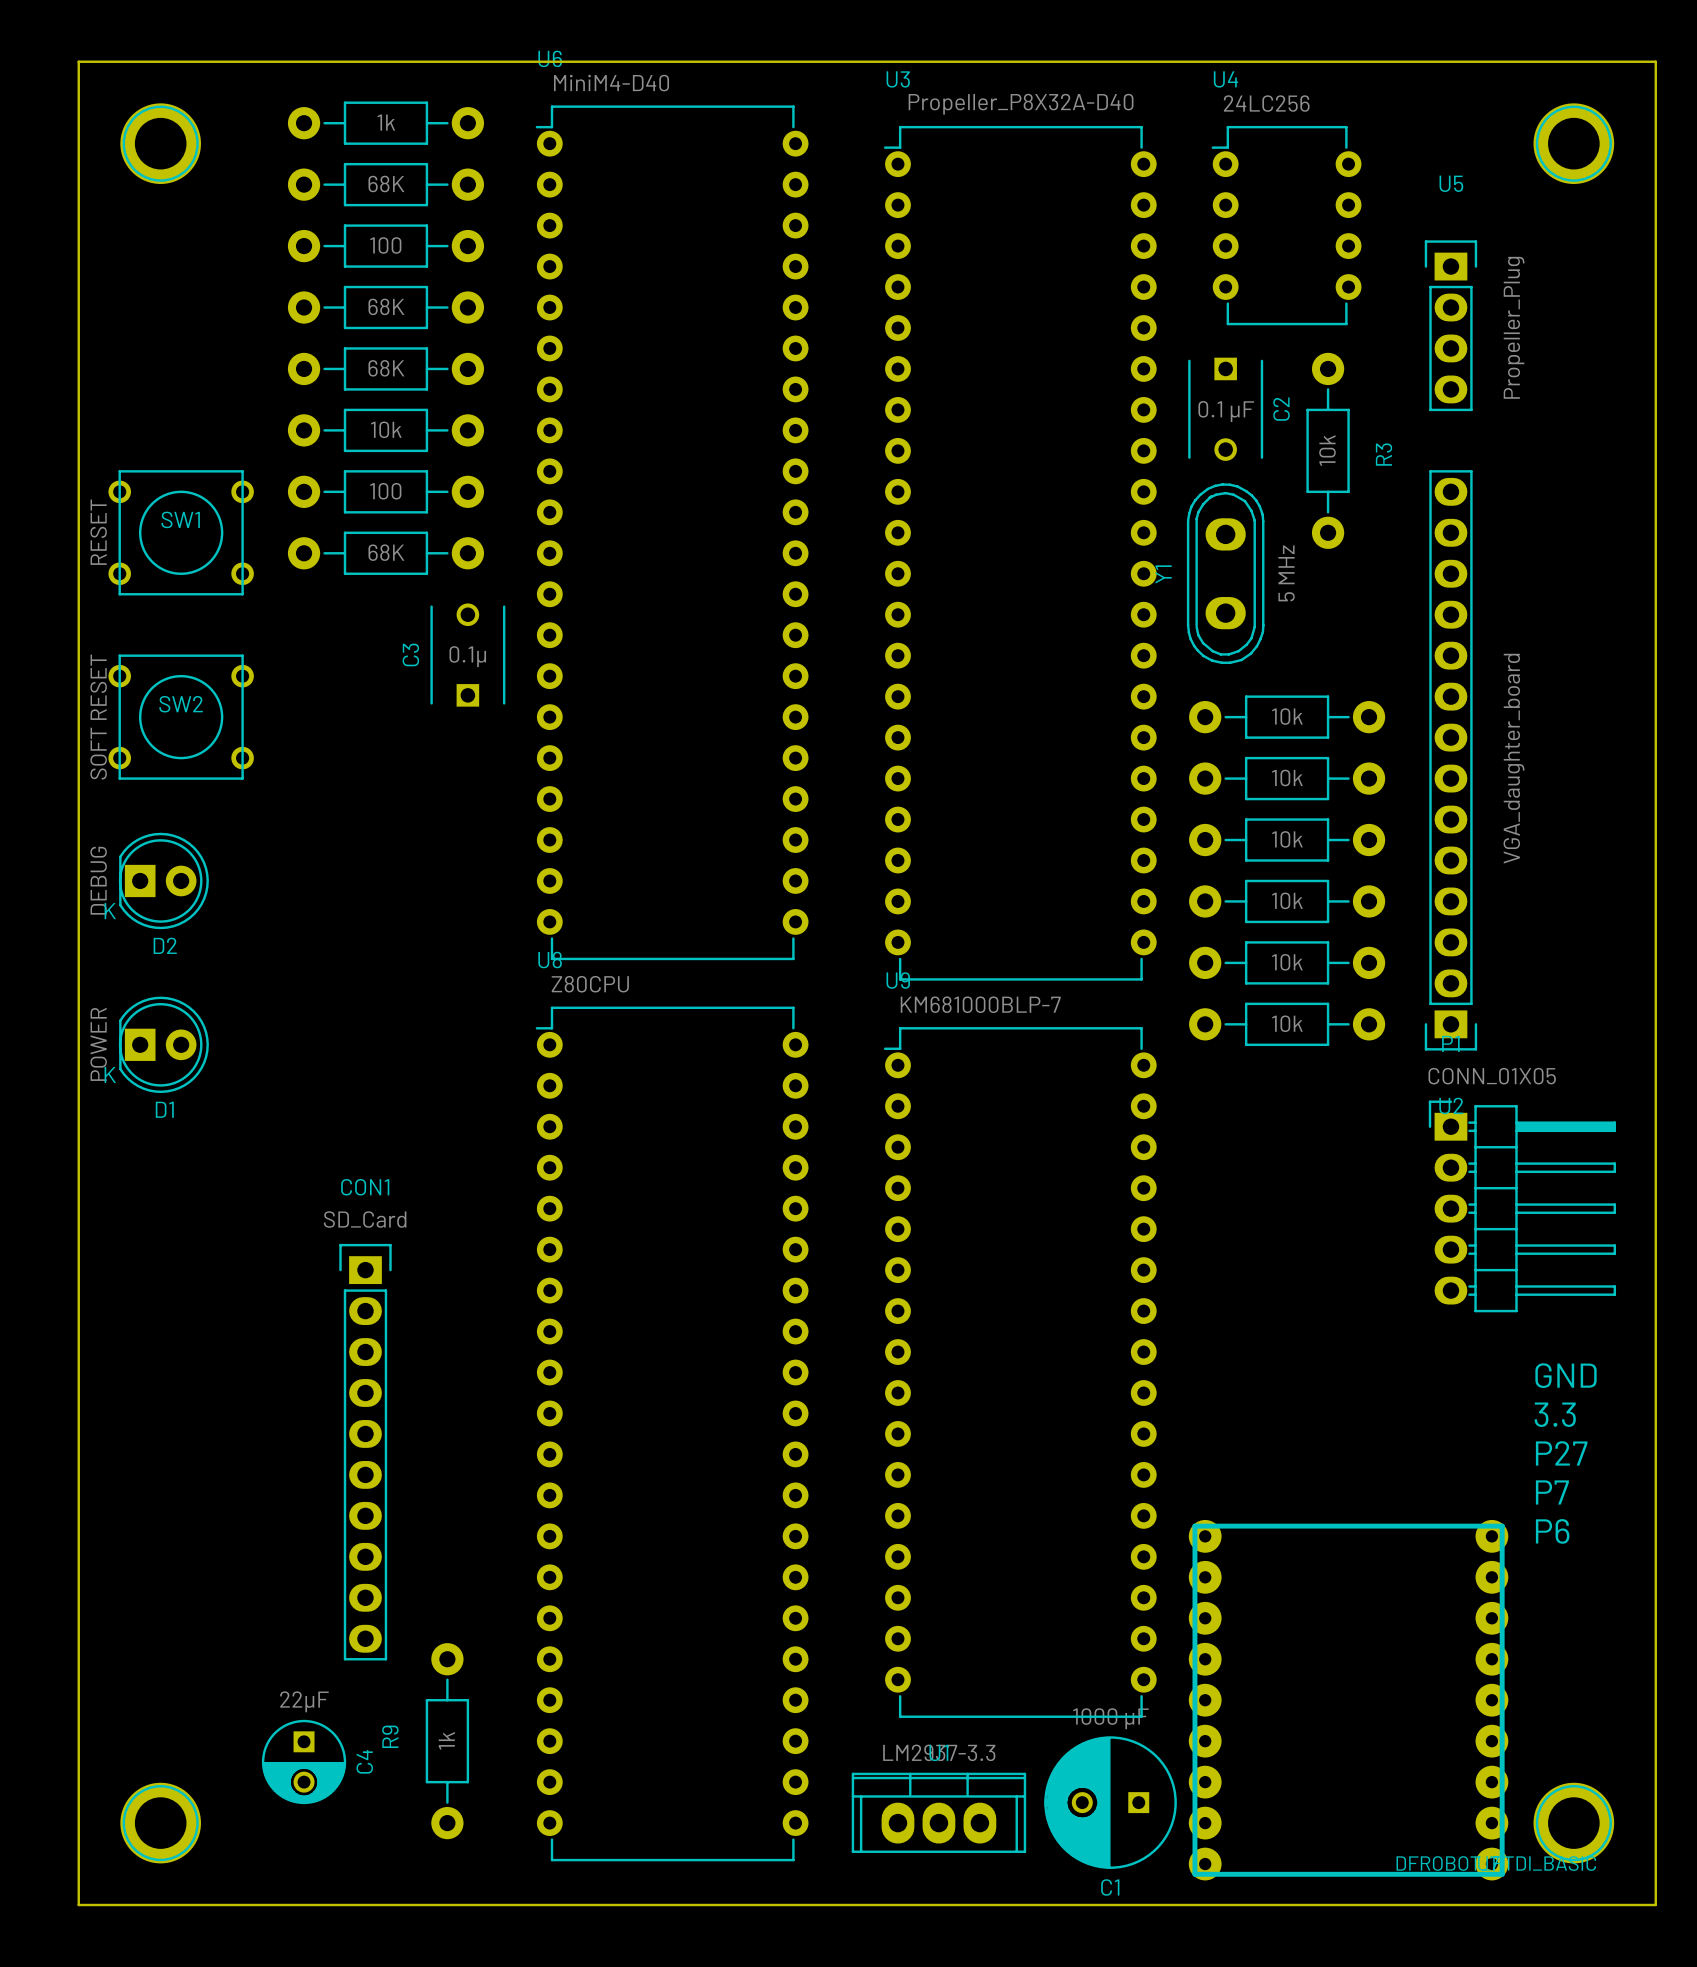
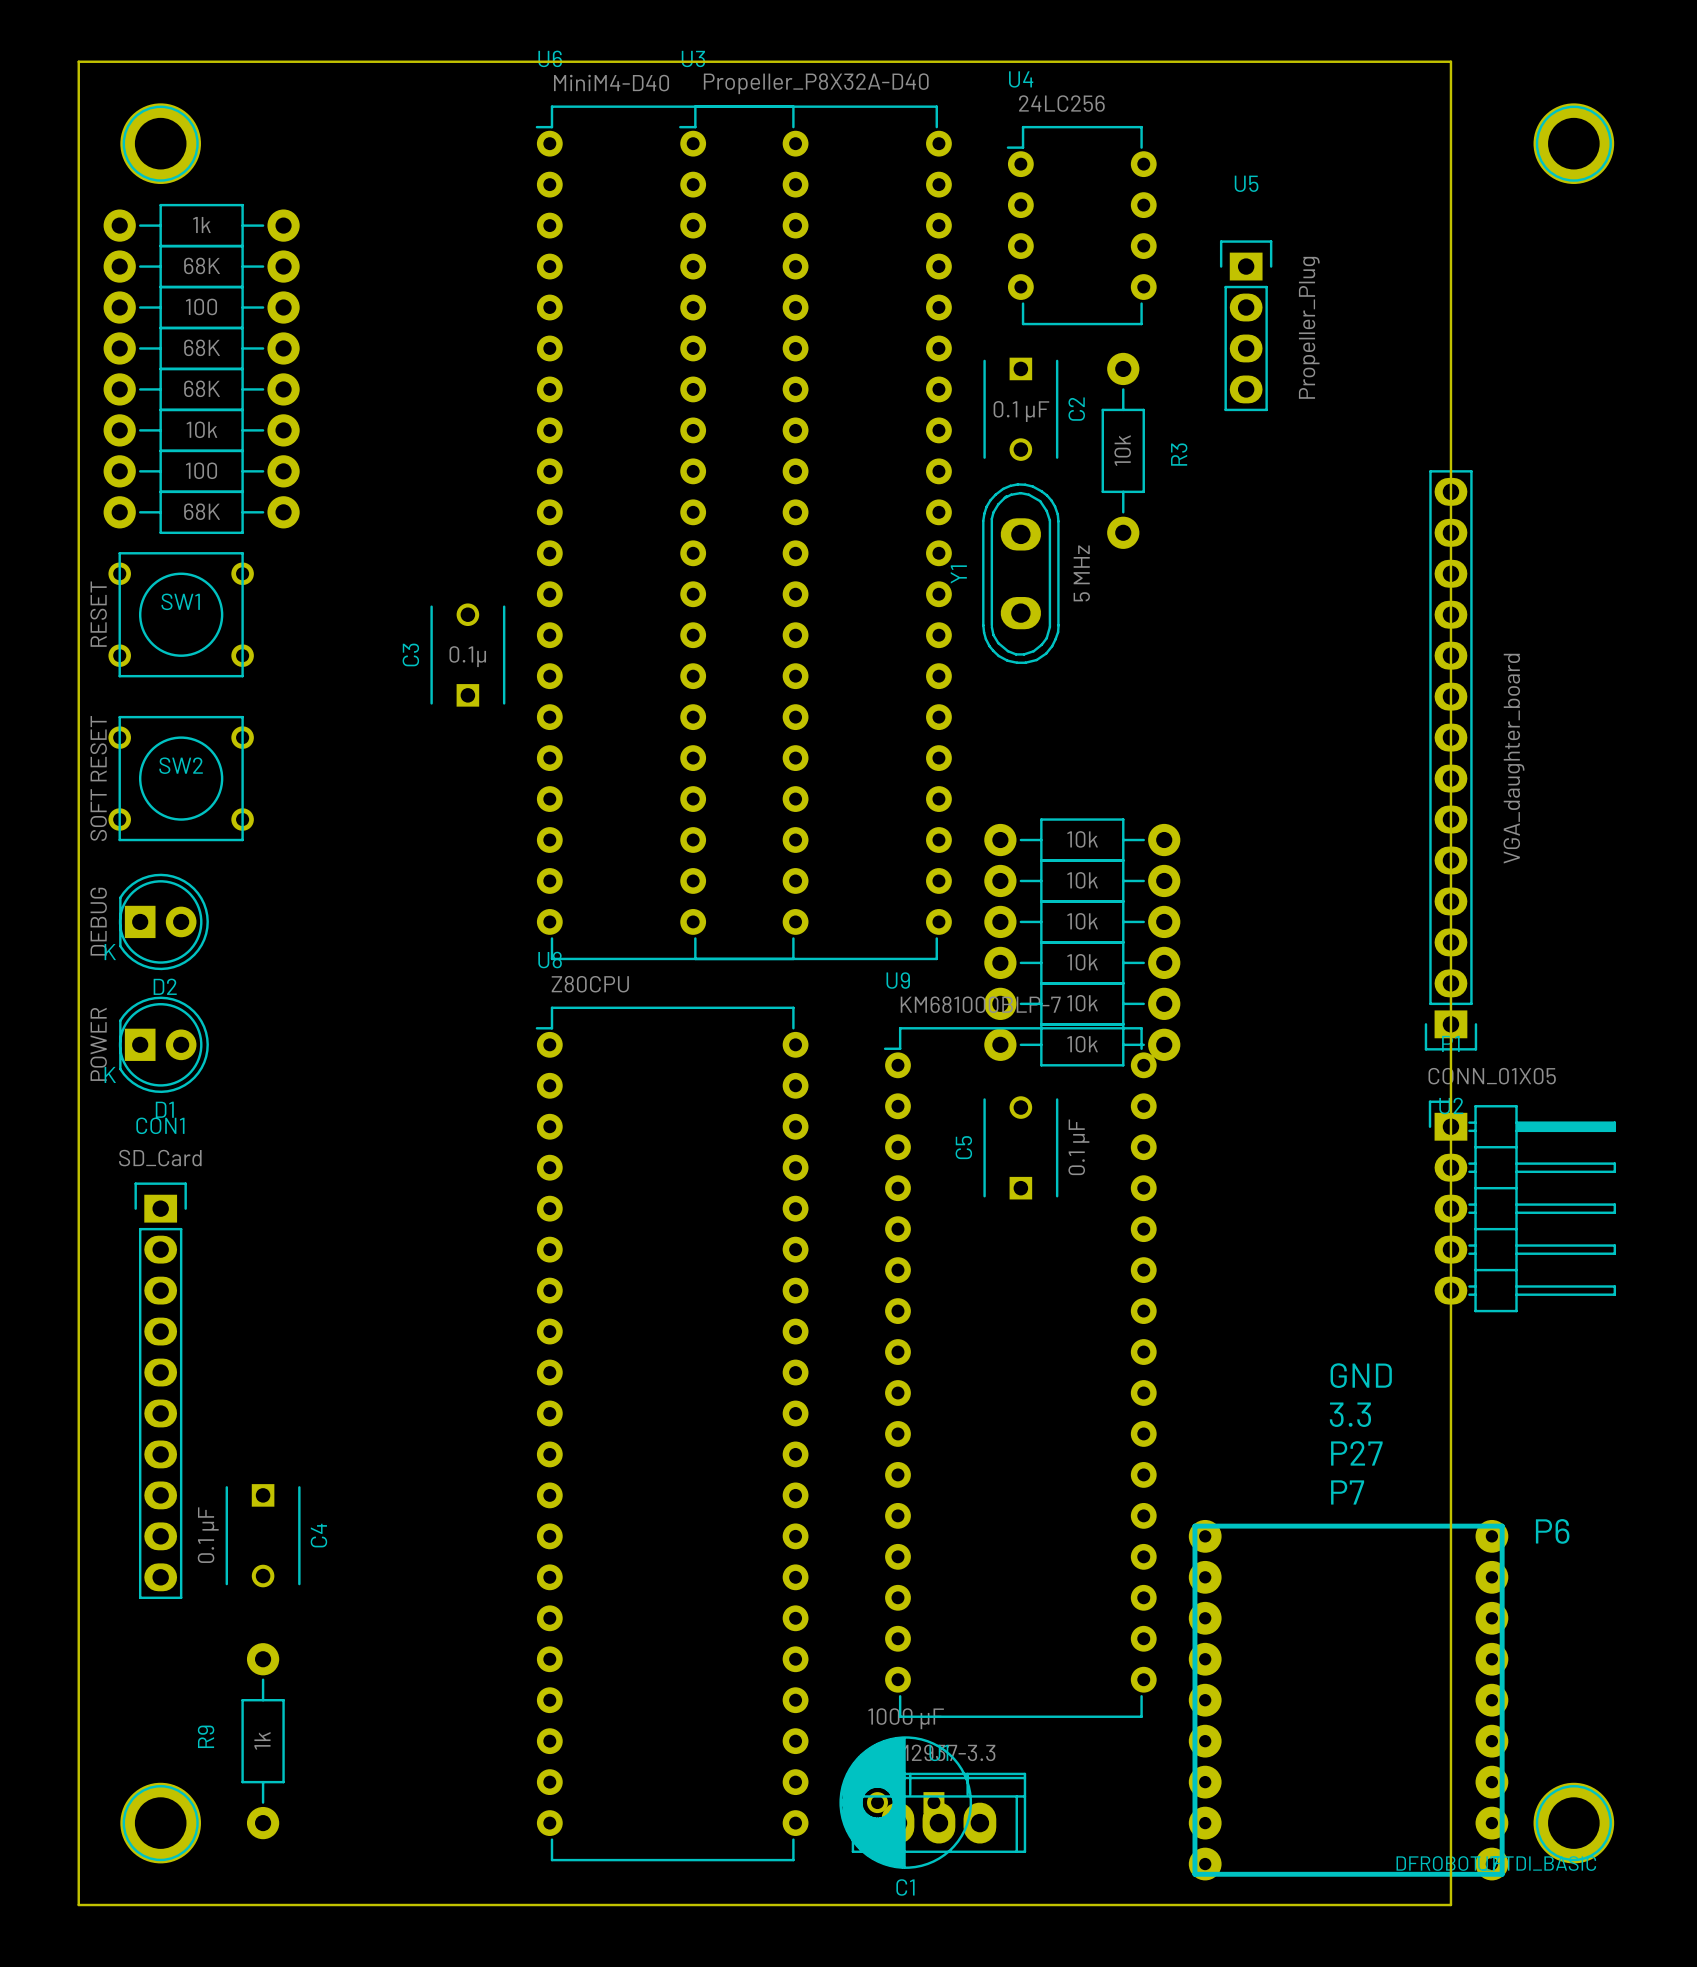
board edge: (1450, 61) (1655, 61) (1655, 1905) (1450, 1905) -> (1450, 61) (1450, 1905)
part position: (385, 123) -> (201, 225)
part: 68K (385, 184) -> none
U4 position: (1286, 225) -> (1081, 225)
part: 100 (385, 246) -> none
part: none -> 68K (201, 266)
part: none -> 100 (201, 307)
part: 68K (385, 307) -> none
U5 position: (1450, 325) -> (1246, 325)
part: none -> 68K (201, 348)
part: 68K (385, 368) -> none
part: none -> 68K (201, 389)
C2 position: (1225, 409) -> (1020, 409)
part position: (385, 430) -> (201, 430)
R3 position: (1328, 450) -> (1123, 450)
part: none -> 100 (201, 471)
part: 100 (385, 491) -> none
part: none -> 68K (201, 512)
SW1 position: (181, 532) -> (181, 614)
part: 68K (385, 553) -> none
U3 position: (1020, 553) -> (815, 532)
Y1 position: (1225, 573) -> (1020, 573)
SW2 position: (181, 717) -> (181, 778)
part: 10k (1287, 717) -> none
part: 10k (1287, 778) -> none
part: none -> 10k (1082, 840)
part: 10k (1287, 840) -> none
D2 position: (163, 880) -> (163, 921)
part: none -> 10k (1082, 880)
part: 10k (1287, 901) -> none
part: none -> 10k (1082, 921)
part: none -> 10k (1082, 962)
part: 10k (1287, 962) -> none
part: none -> 10k (1082, 1003)
part: 10k (1287, 1024) -> none
part: none -> 10k (1082, 1044)
C5: none -> 0.1 µF (1020, 1147)
text position: GND (1566, 1375) -> GND (1361, 1375)
text position: 3.3 (1555, 1414) -> 3.3 (1350, 1414)
CON1 position: (365, 1452) -> (160, 1390)
text position: P27 (1561, 1453) -> P27 (1356, 1453)
text position: P7 (1552, 1492) -> P7 (1347, 1492)
C4 value: 22µF (304, 1701) -> 0.1 µF (208, 1535)
C4 footprint: [261, 1719, 347, 1805] -> [225, 1484, 301, 1588]
R9 position: (447, 1741) -> (263, 1741)
C1 position: (1110, 1802) -> (905, 1802)

